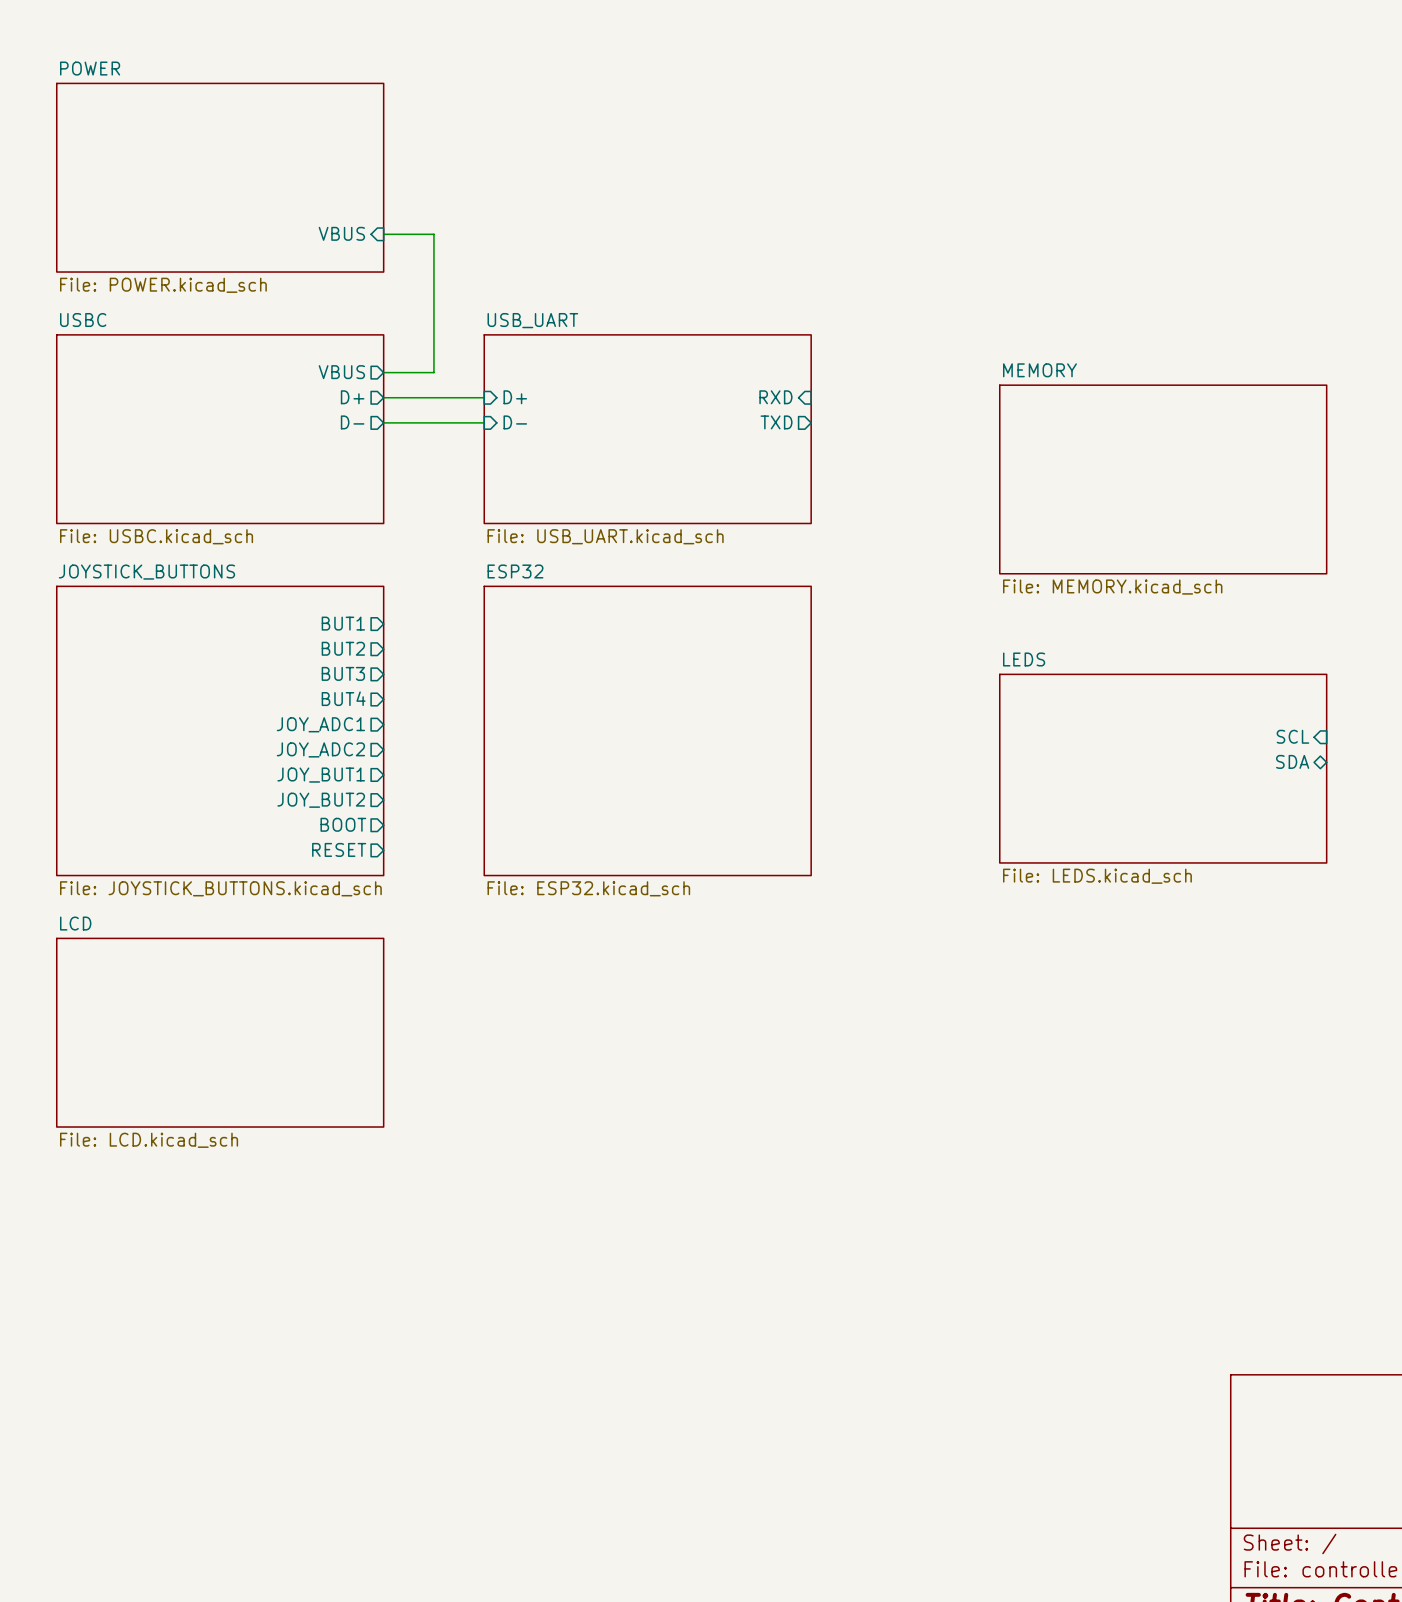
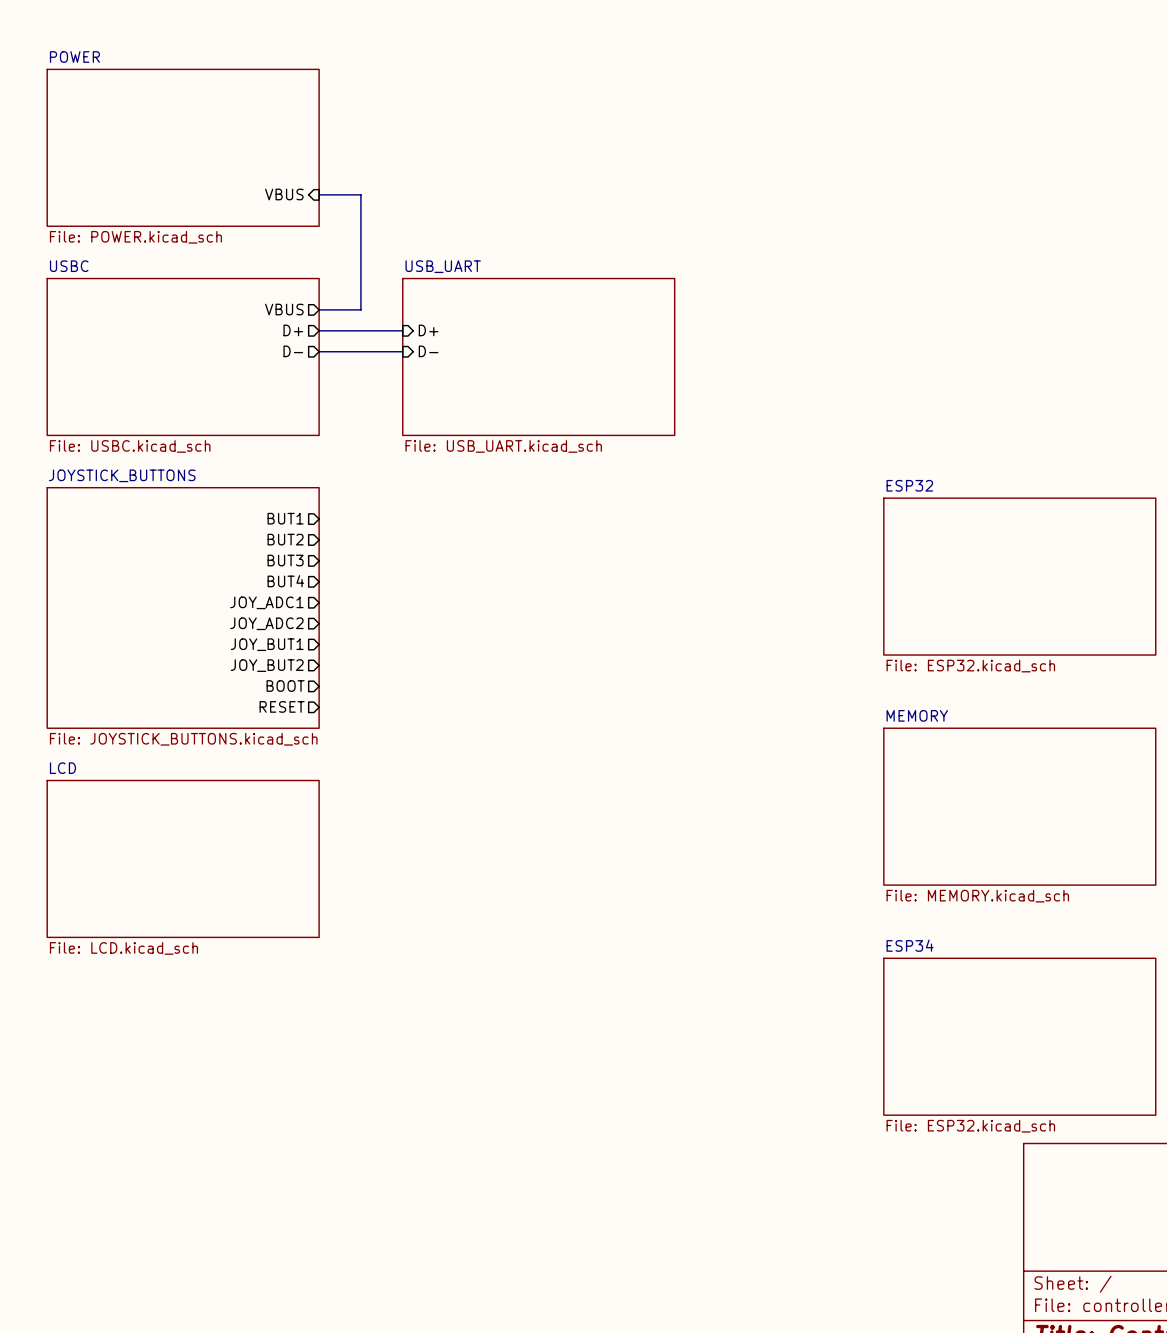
sheet pin: RXD (775, 397) -> none
sheet pin: TXD (776, 422) -> none
sheet MEMORY: File: MEMORY.kicad_sch (1163, 479) -> none
sheet ESP32 name position: ESP32 (515, 571) -> ESP32 (909, 485)
sheet ESP32 shape: [483, 585, 812, 877] -> [883, 497, 1157, 656]
sheet pin: SCL (1292, 736) -> none
sheet pin: SDA (1292, 761) -> none
sheet LEDS: File: LEDS.kicad_sch (1163, 768) -> none
sheet ESP32 value position: File: ESP32.kicad_sch (588, 888) -> File: ESP32.kicad_sch (970, 666)
sheet MEMORY: none -> File: MEMORY.kicad_sch (1019, 806)
sheet ESP34: none -> File: ESP32.kicad_sch (1019, 1036)

